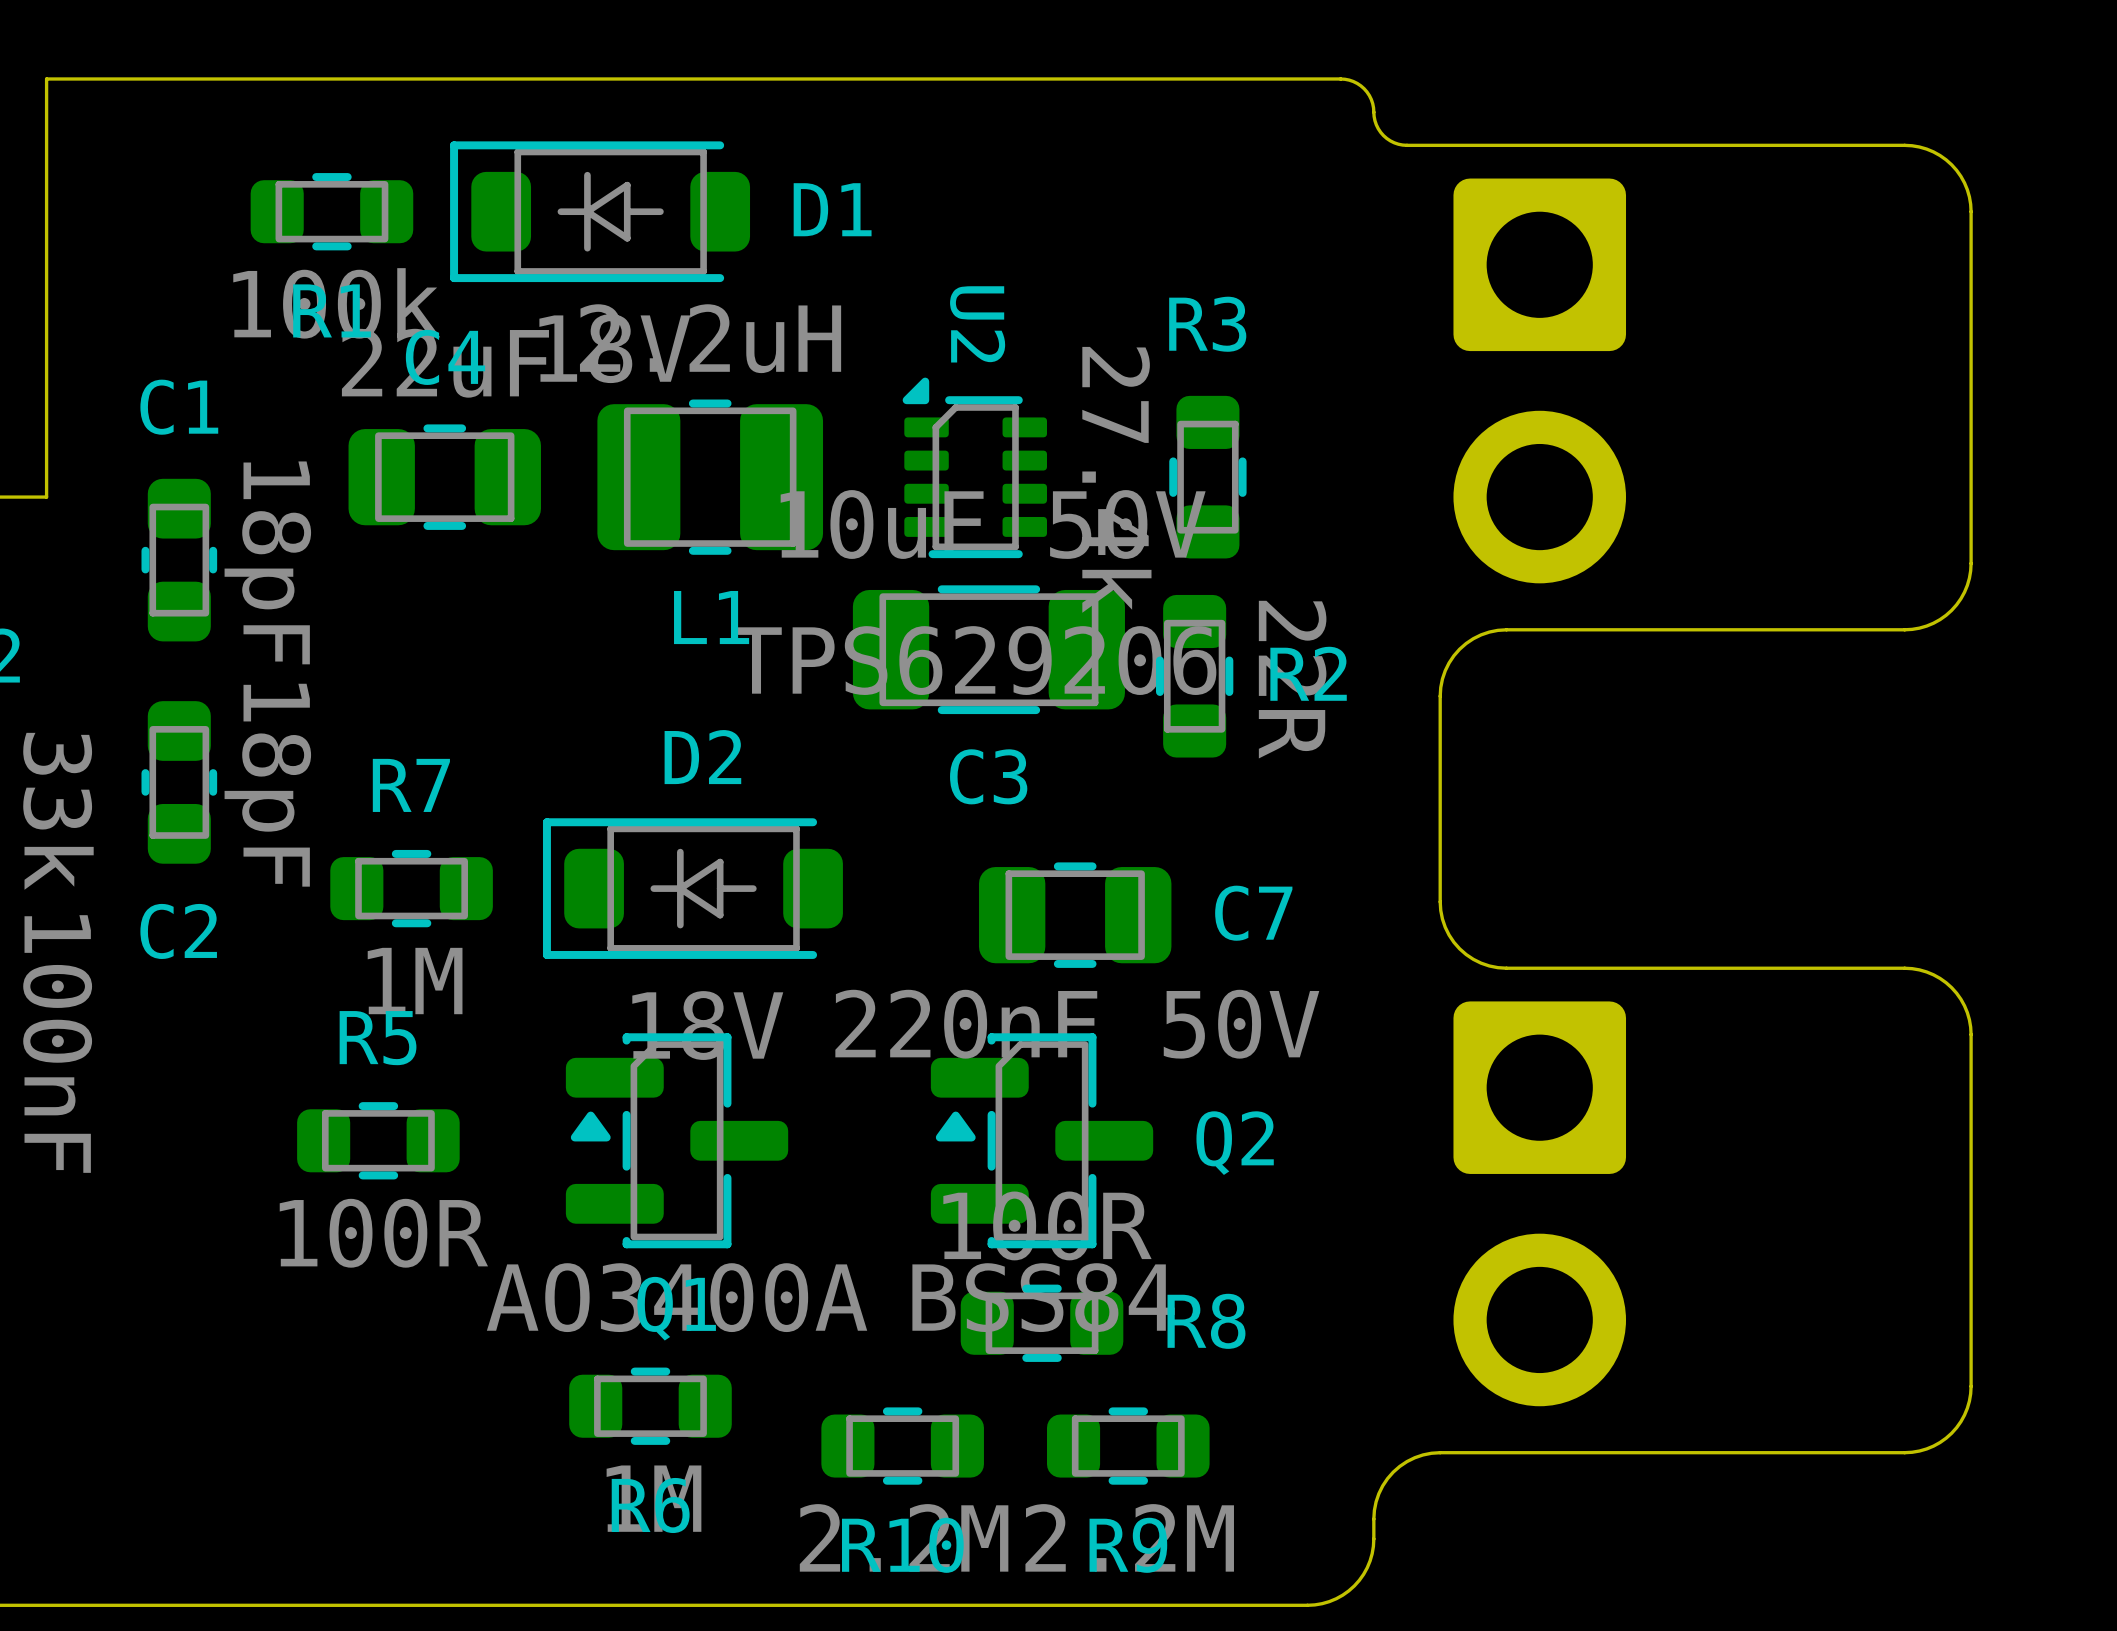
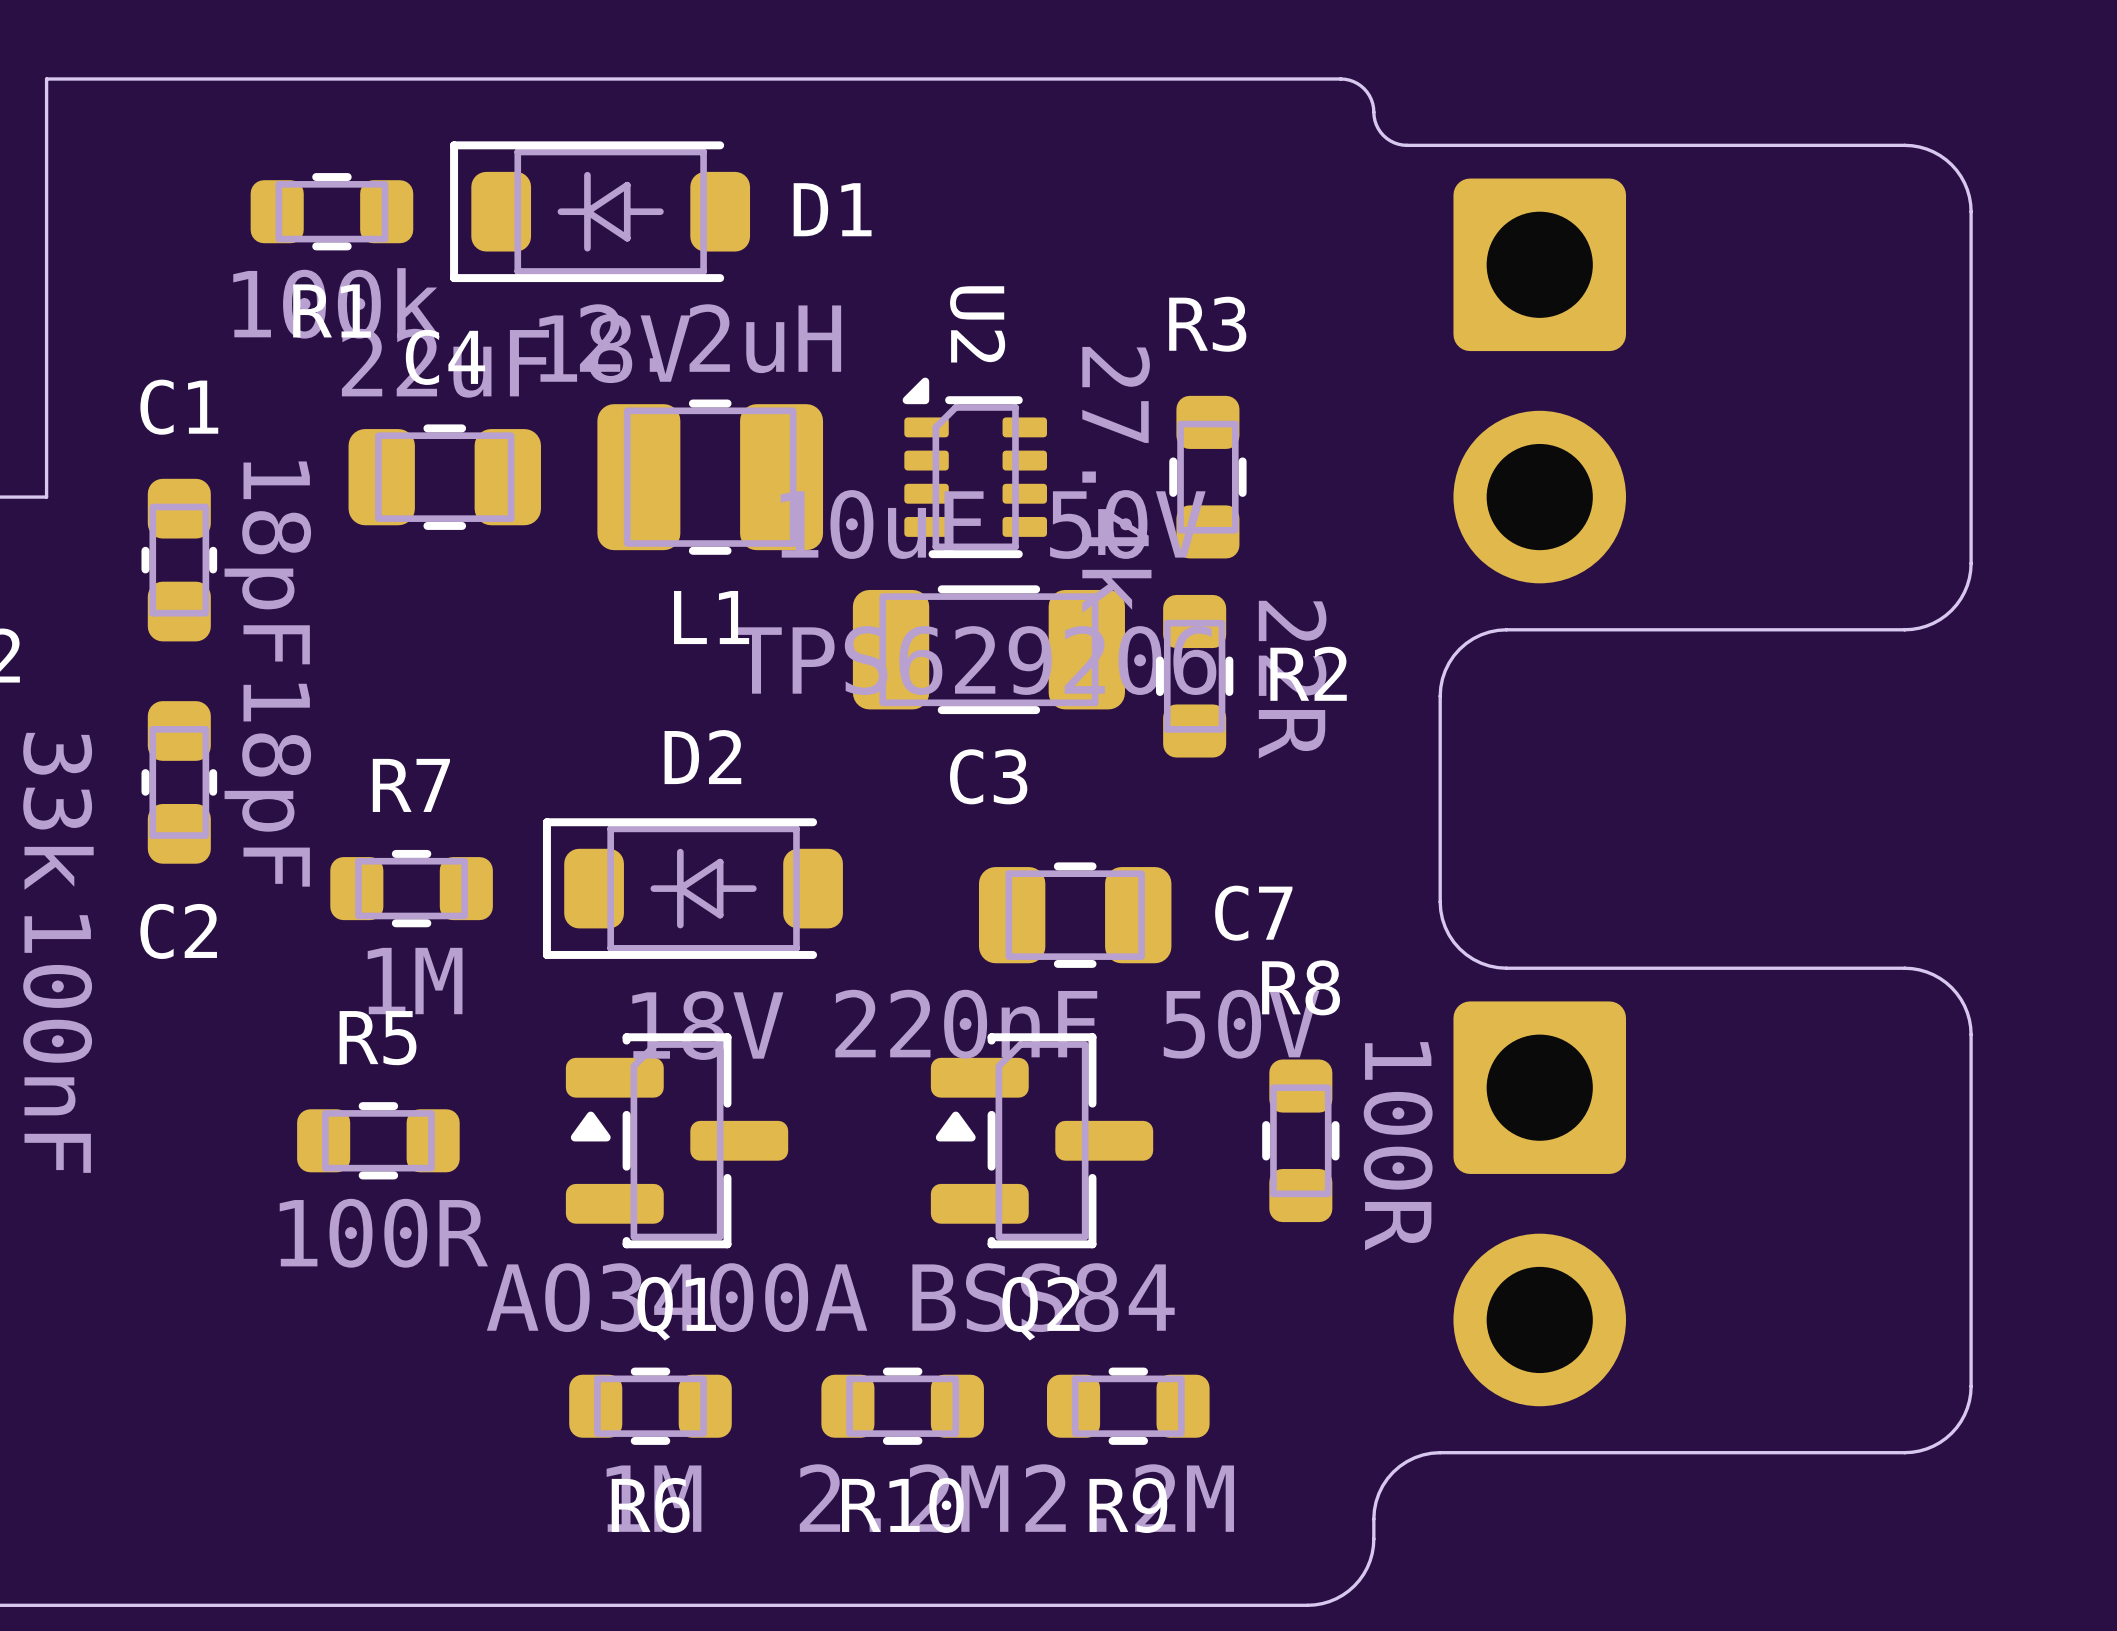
Q2 name position: Q2 (1235, 1143) -> Q2 (1041, 1308)
R8 name position: R8 (1206, 1321) -> R8 (1301, 987)
R8 rotation: 0° (1042, 1323) -> 90° clockwise (1300, 1140)
R8 position: (1042, 1323) -> (1300, 1140)
R10 position: (902, 1446) -> (902, 1406)
R9 position: (1128, 1446) -> (1128, 1406)

